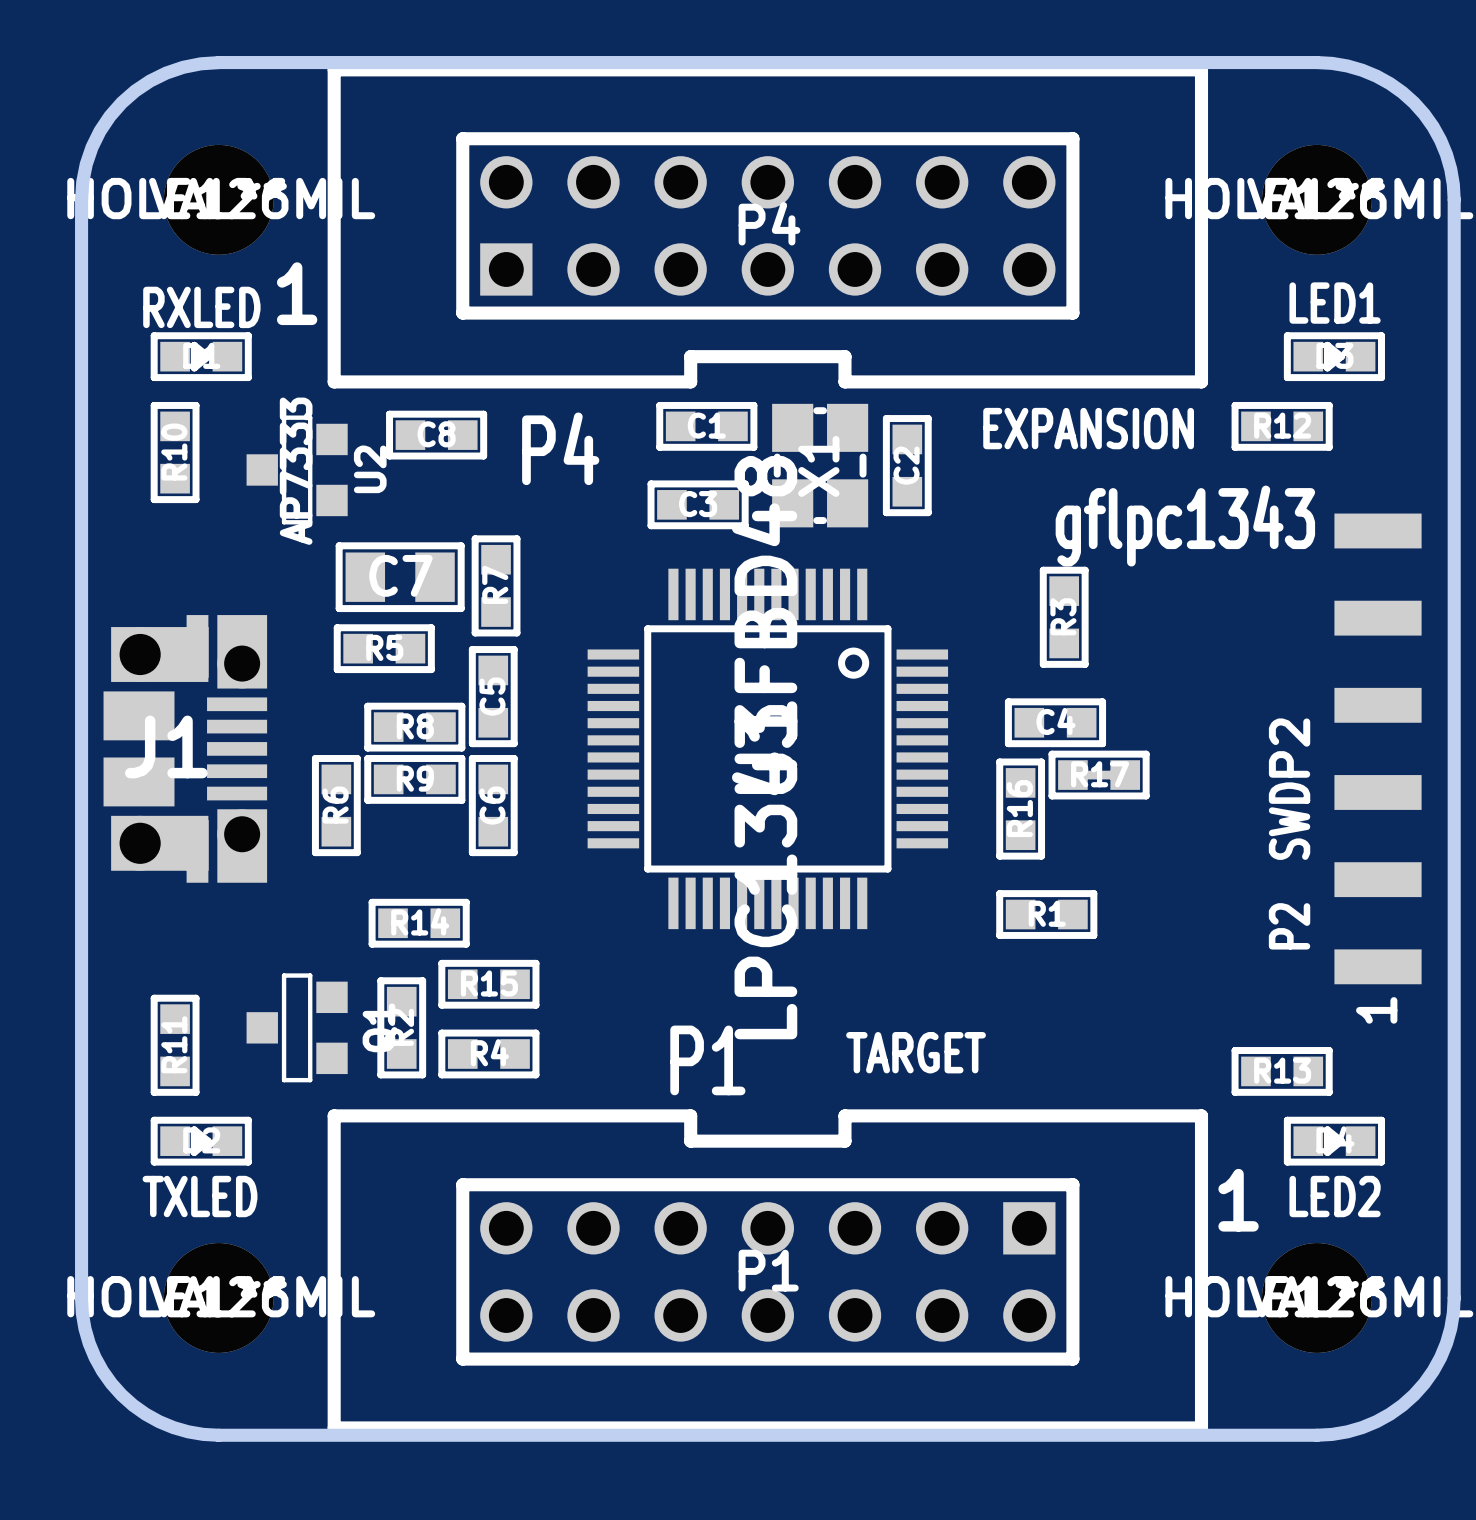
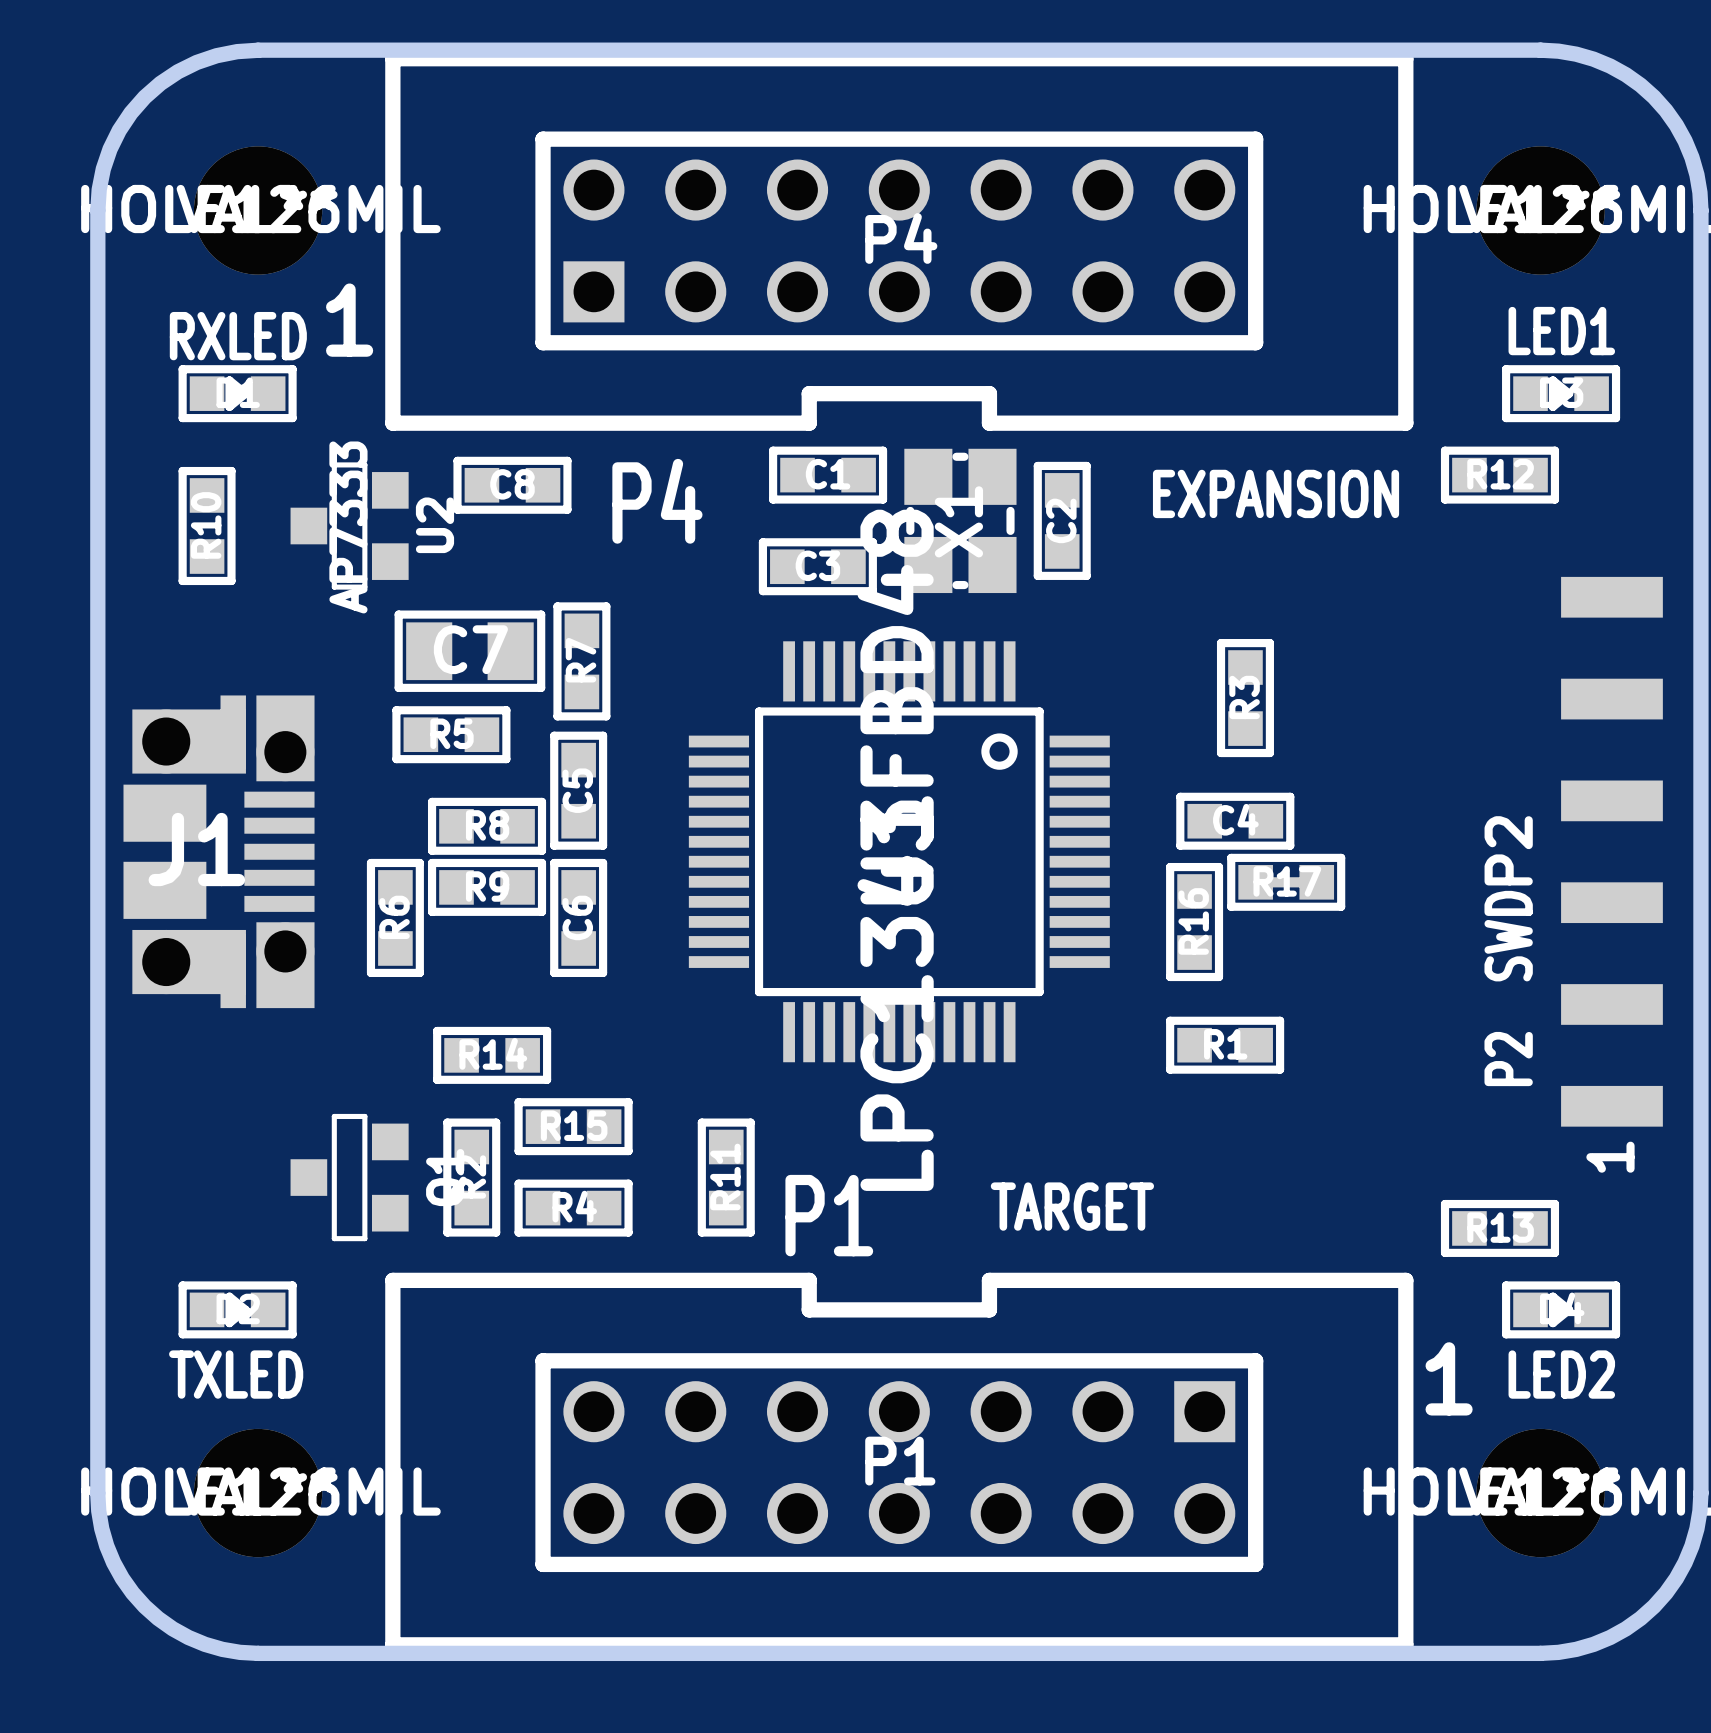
text position: EXPANSION (1088, 428) -> EXPANSION (1276, 493)
part position: (175, 452) -> (207, 526)
text: gflpc1343 (1185, 526) -> none
part position: (175, 1045) -> (726, 1177)

